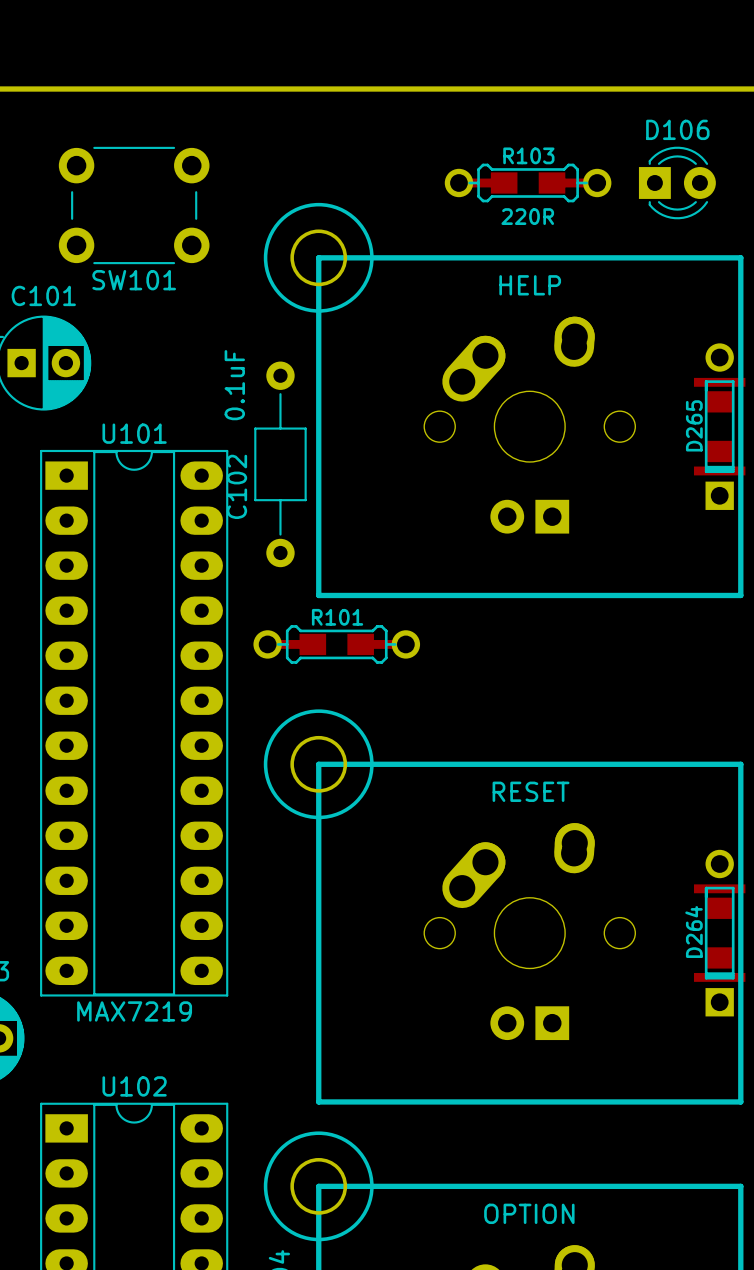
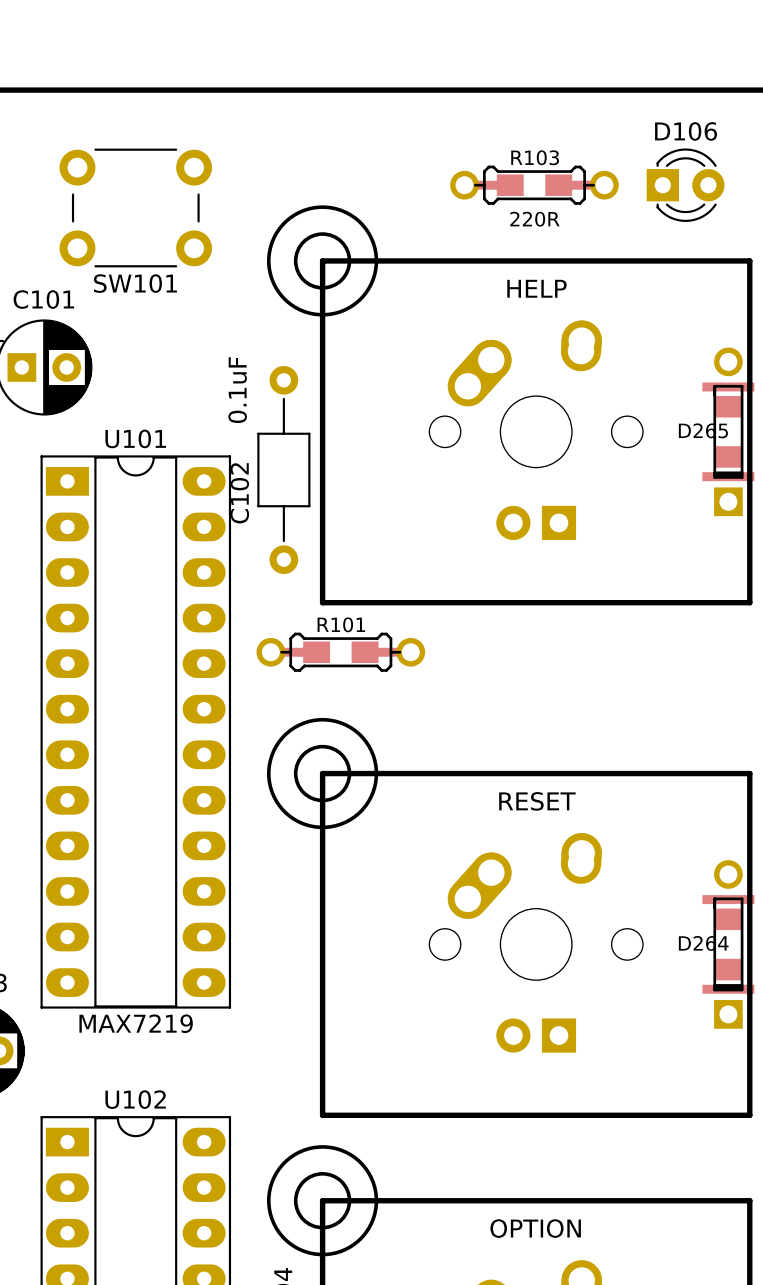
D265 name rotation: 0° (694, 425) -> 90° clockwise (703, 430)
D264 name rotation: 0° (694, 932) -> 90° clockwise (703, 943)

